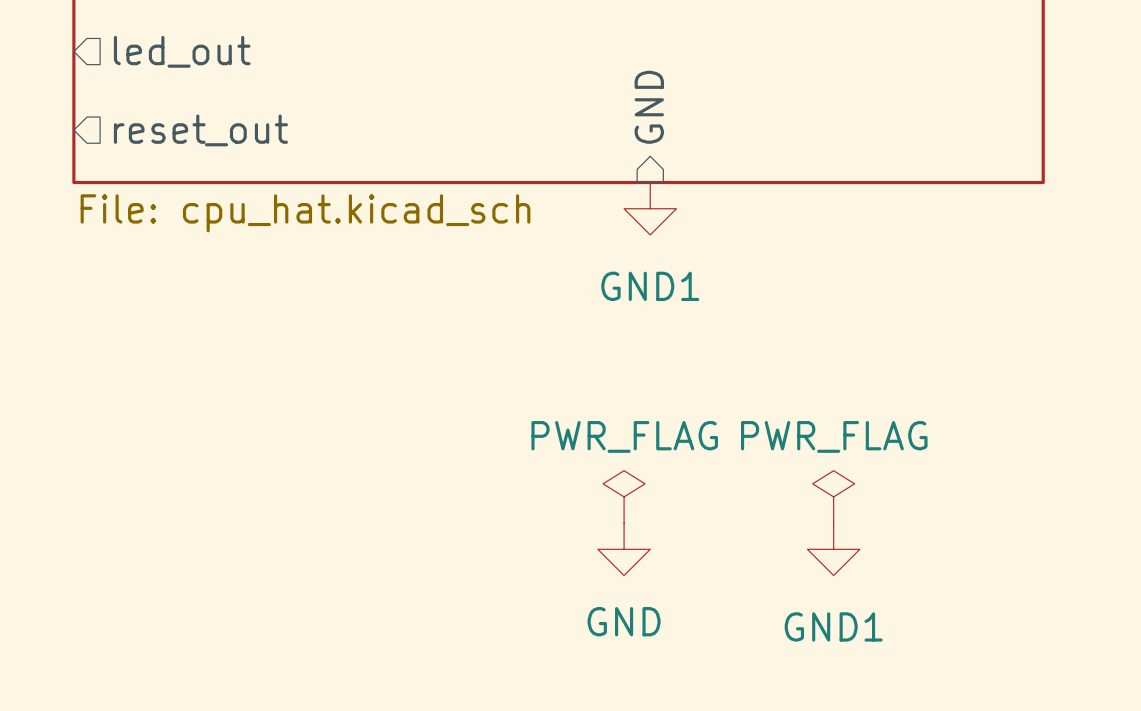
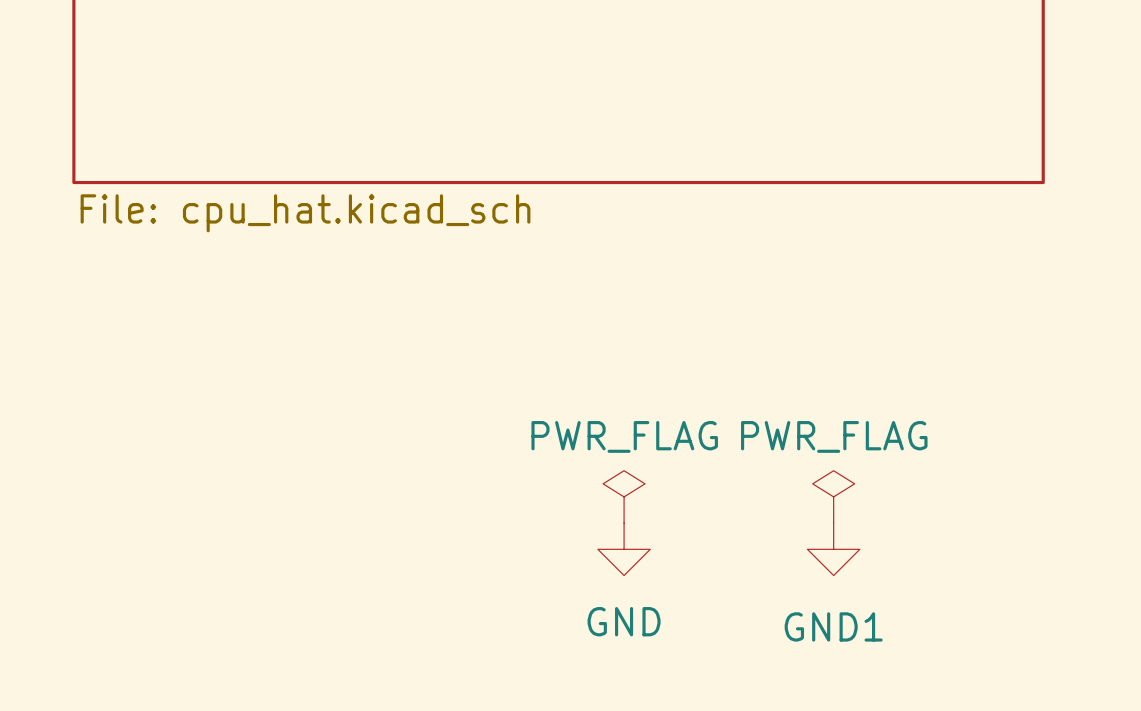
sheet pin: led_out (182, 51) -> none
sheet pin: GND (649, 107) -> none
sheet pin: reset_out (200, 130) -> none
power symbol: GND1 (650, 208) -> none

